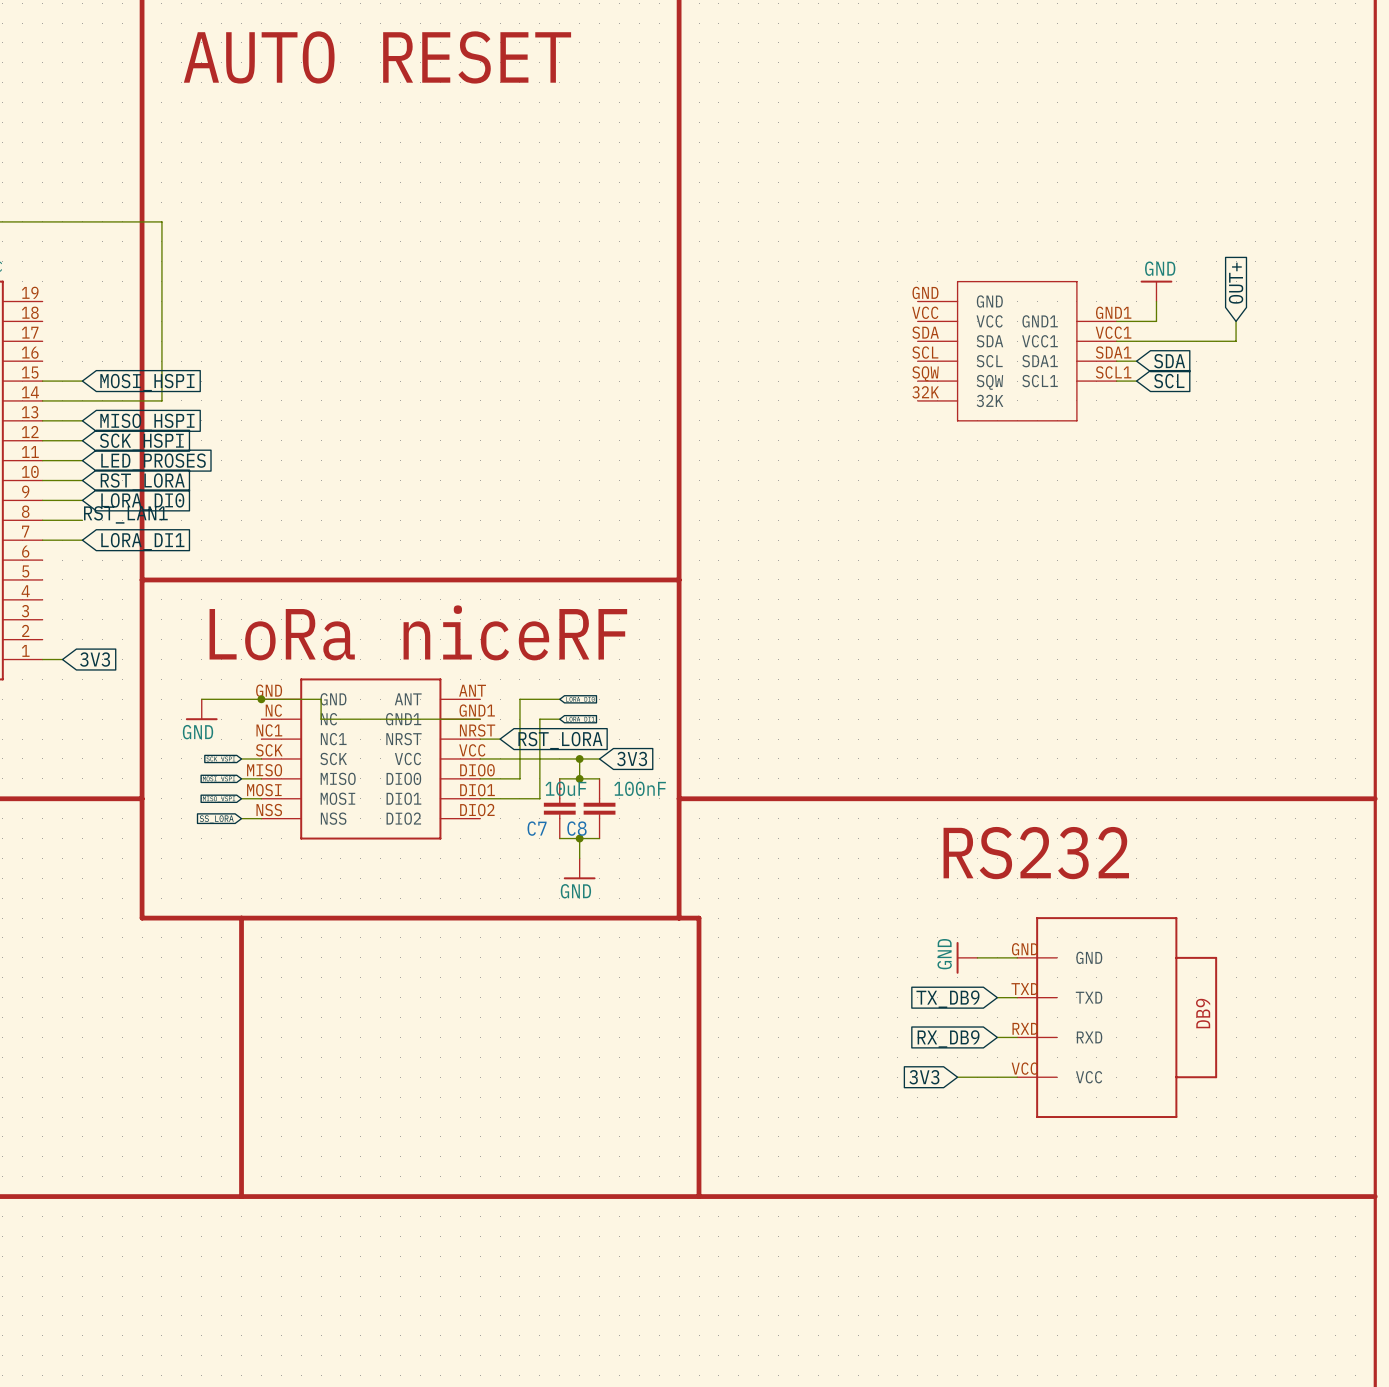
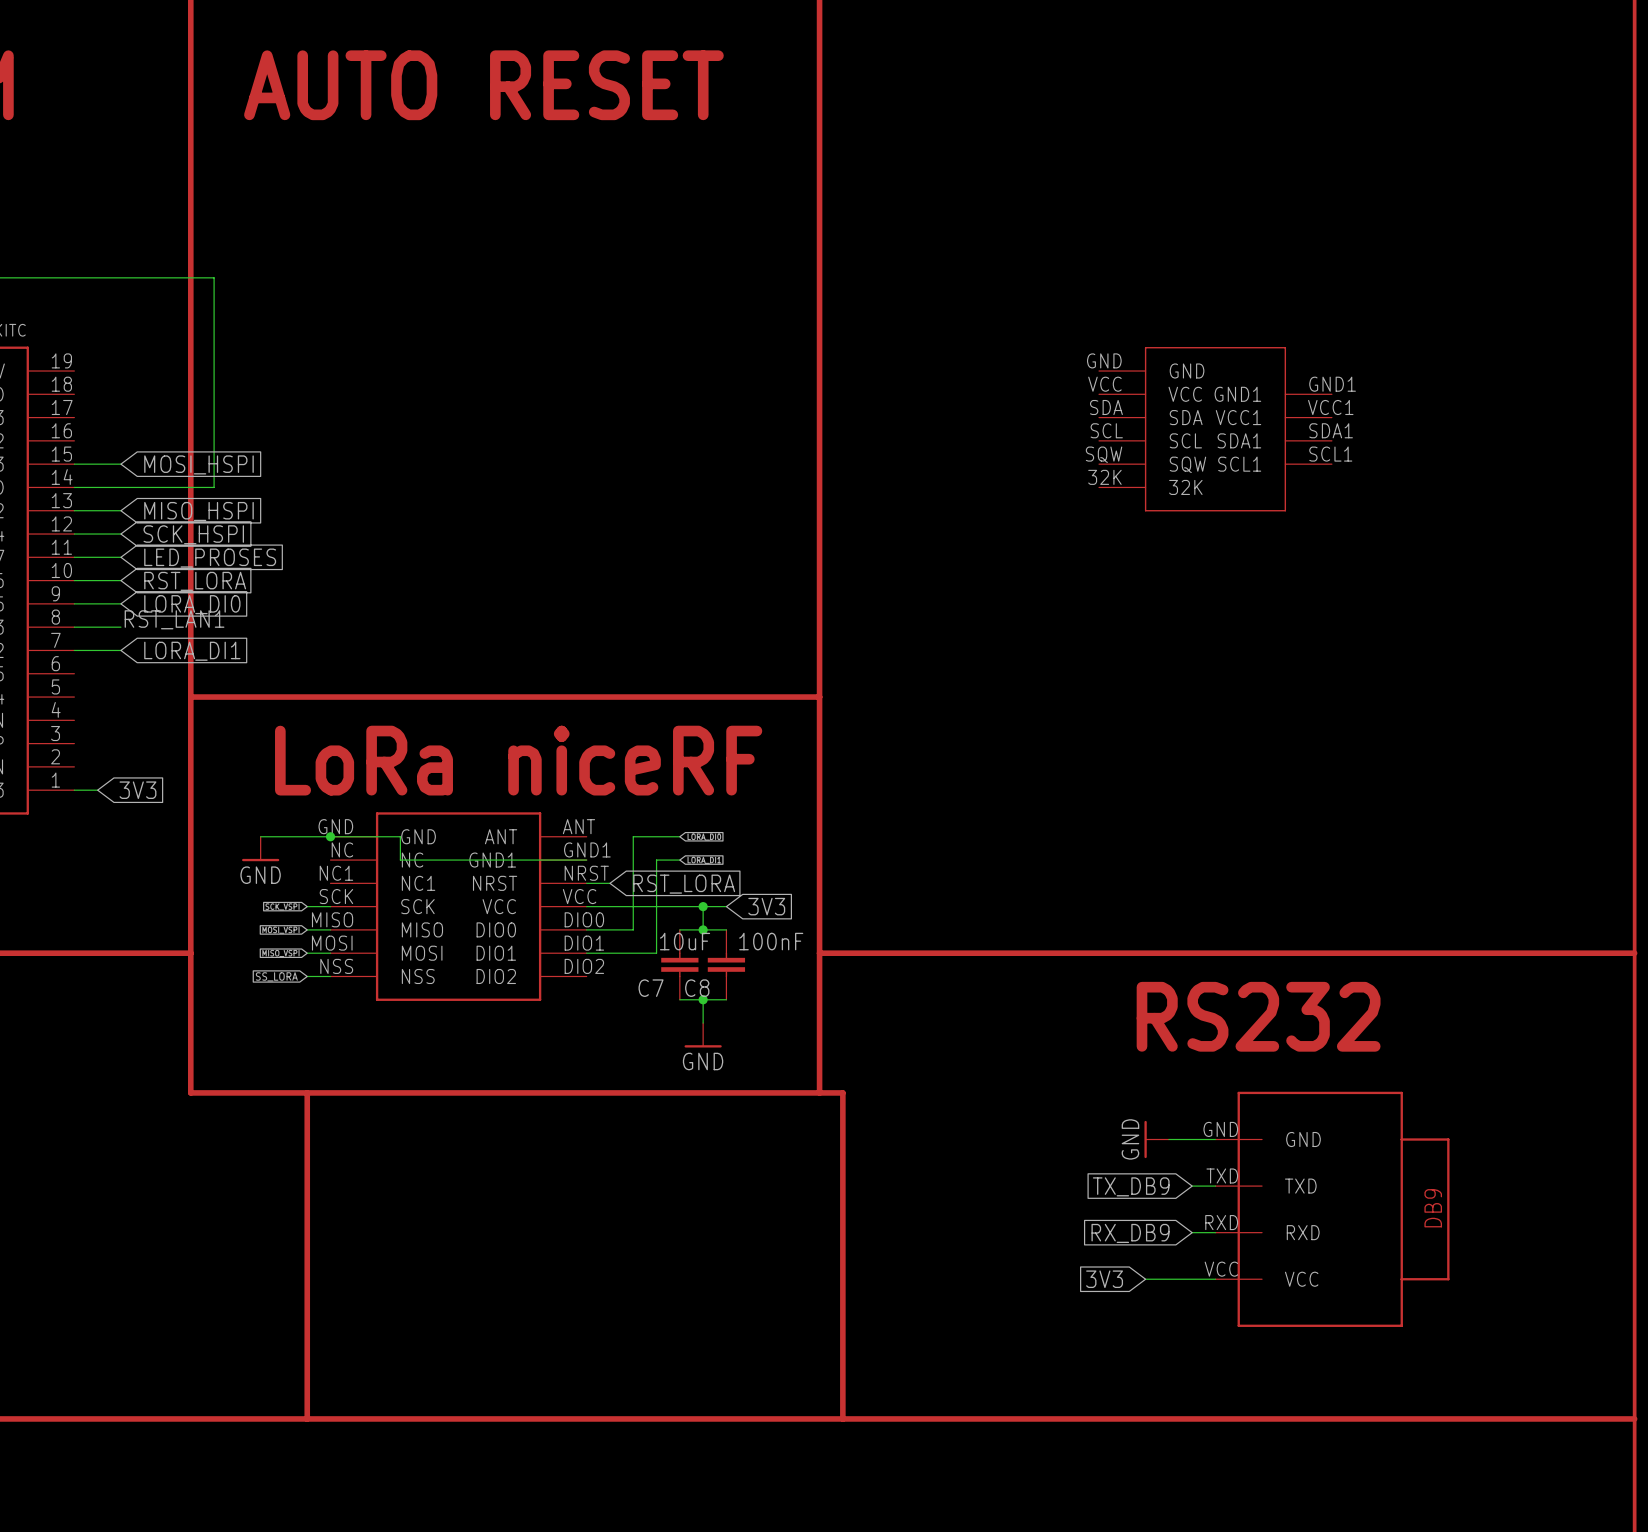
global label: OUT+ (1236, 283) -> none
power symbol: GND (1156, 291) -> none
wire: (1156, 301) (1156, 321) (1116, 321) -> none
wire: (1236, 321) (1236, 341) (1116, 341) -> none
wire: (1116, 361) (1136, 361) -> none
global label: SDA (1169, 361) -> none
wire: (1116, 381) (1136, 381) -> none
global label: SCL (1169, 381) -> none

